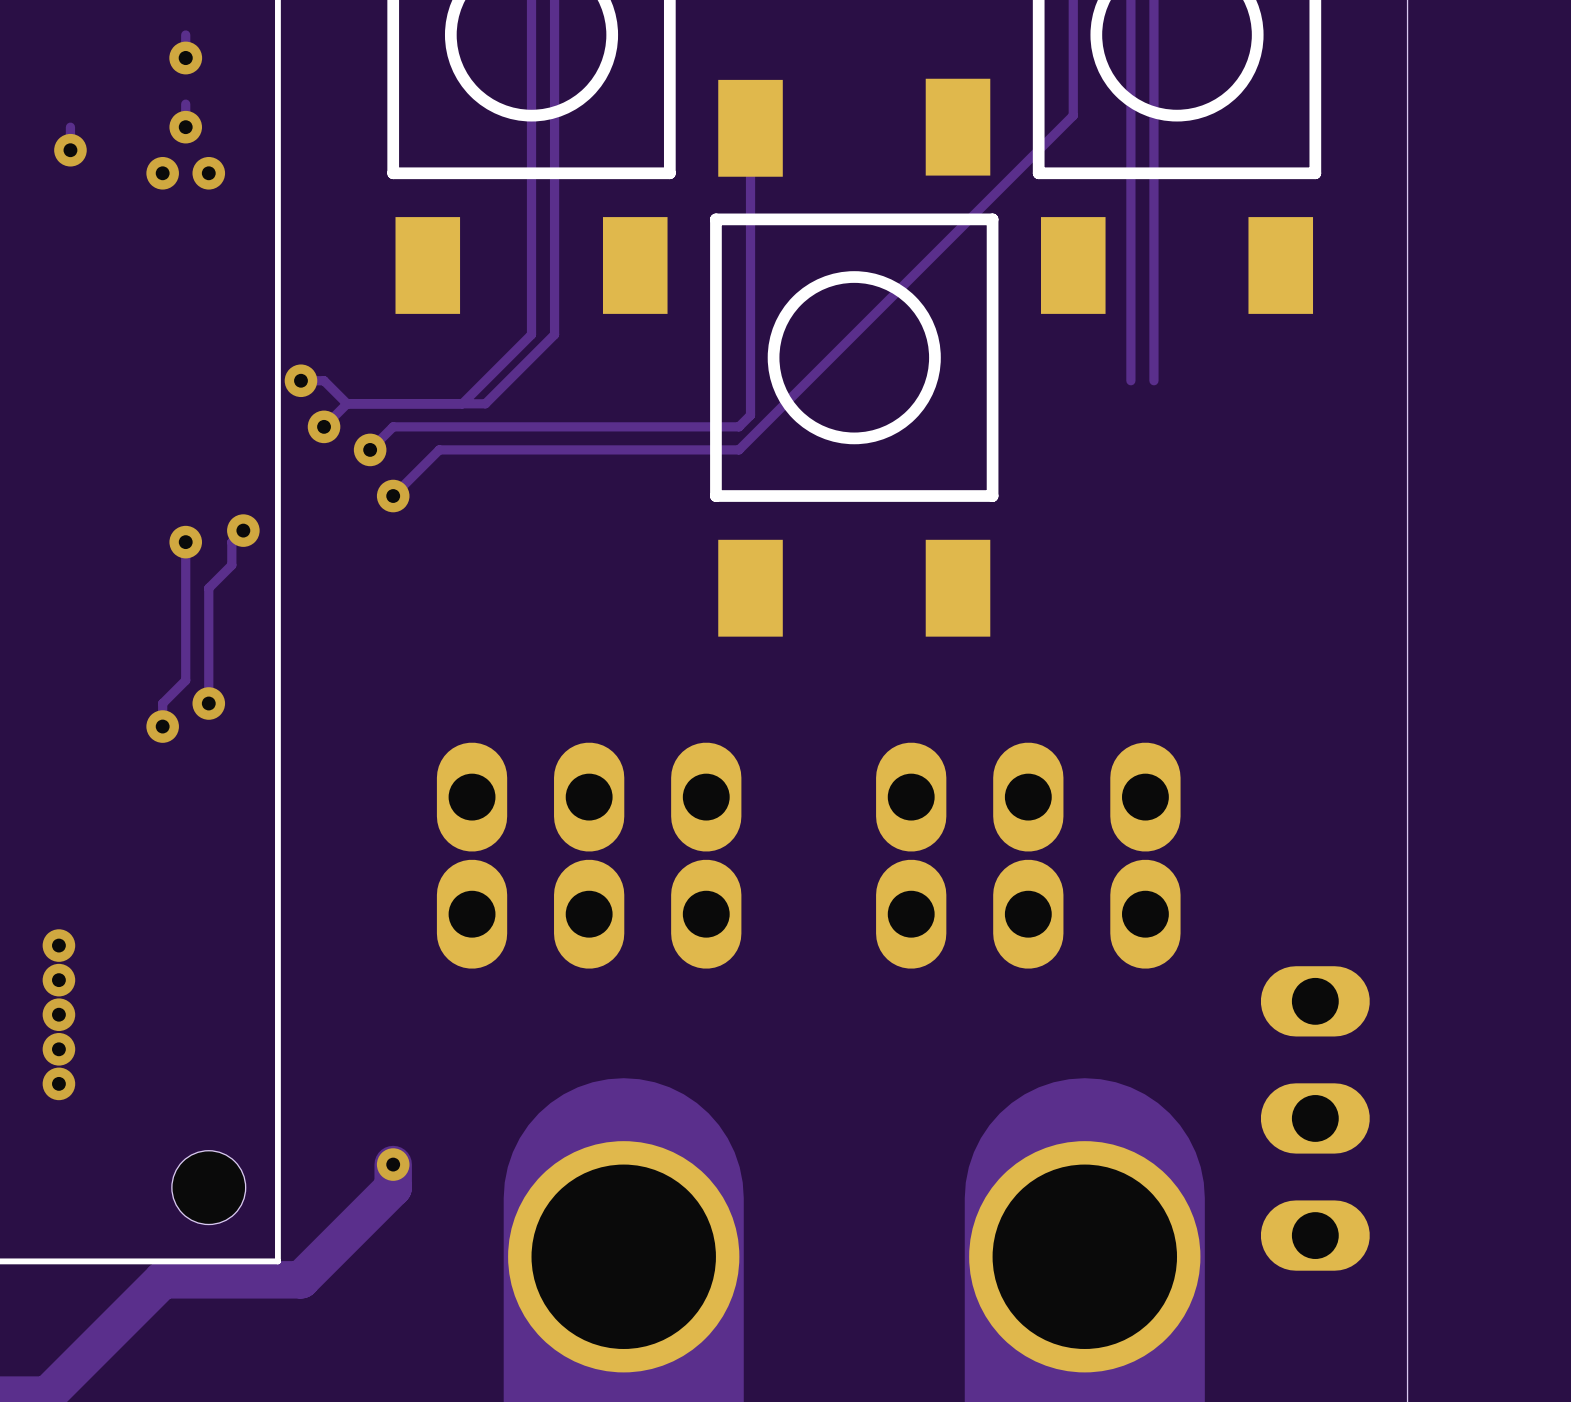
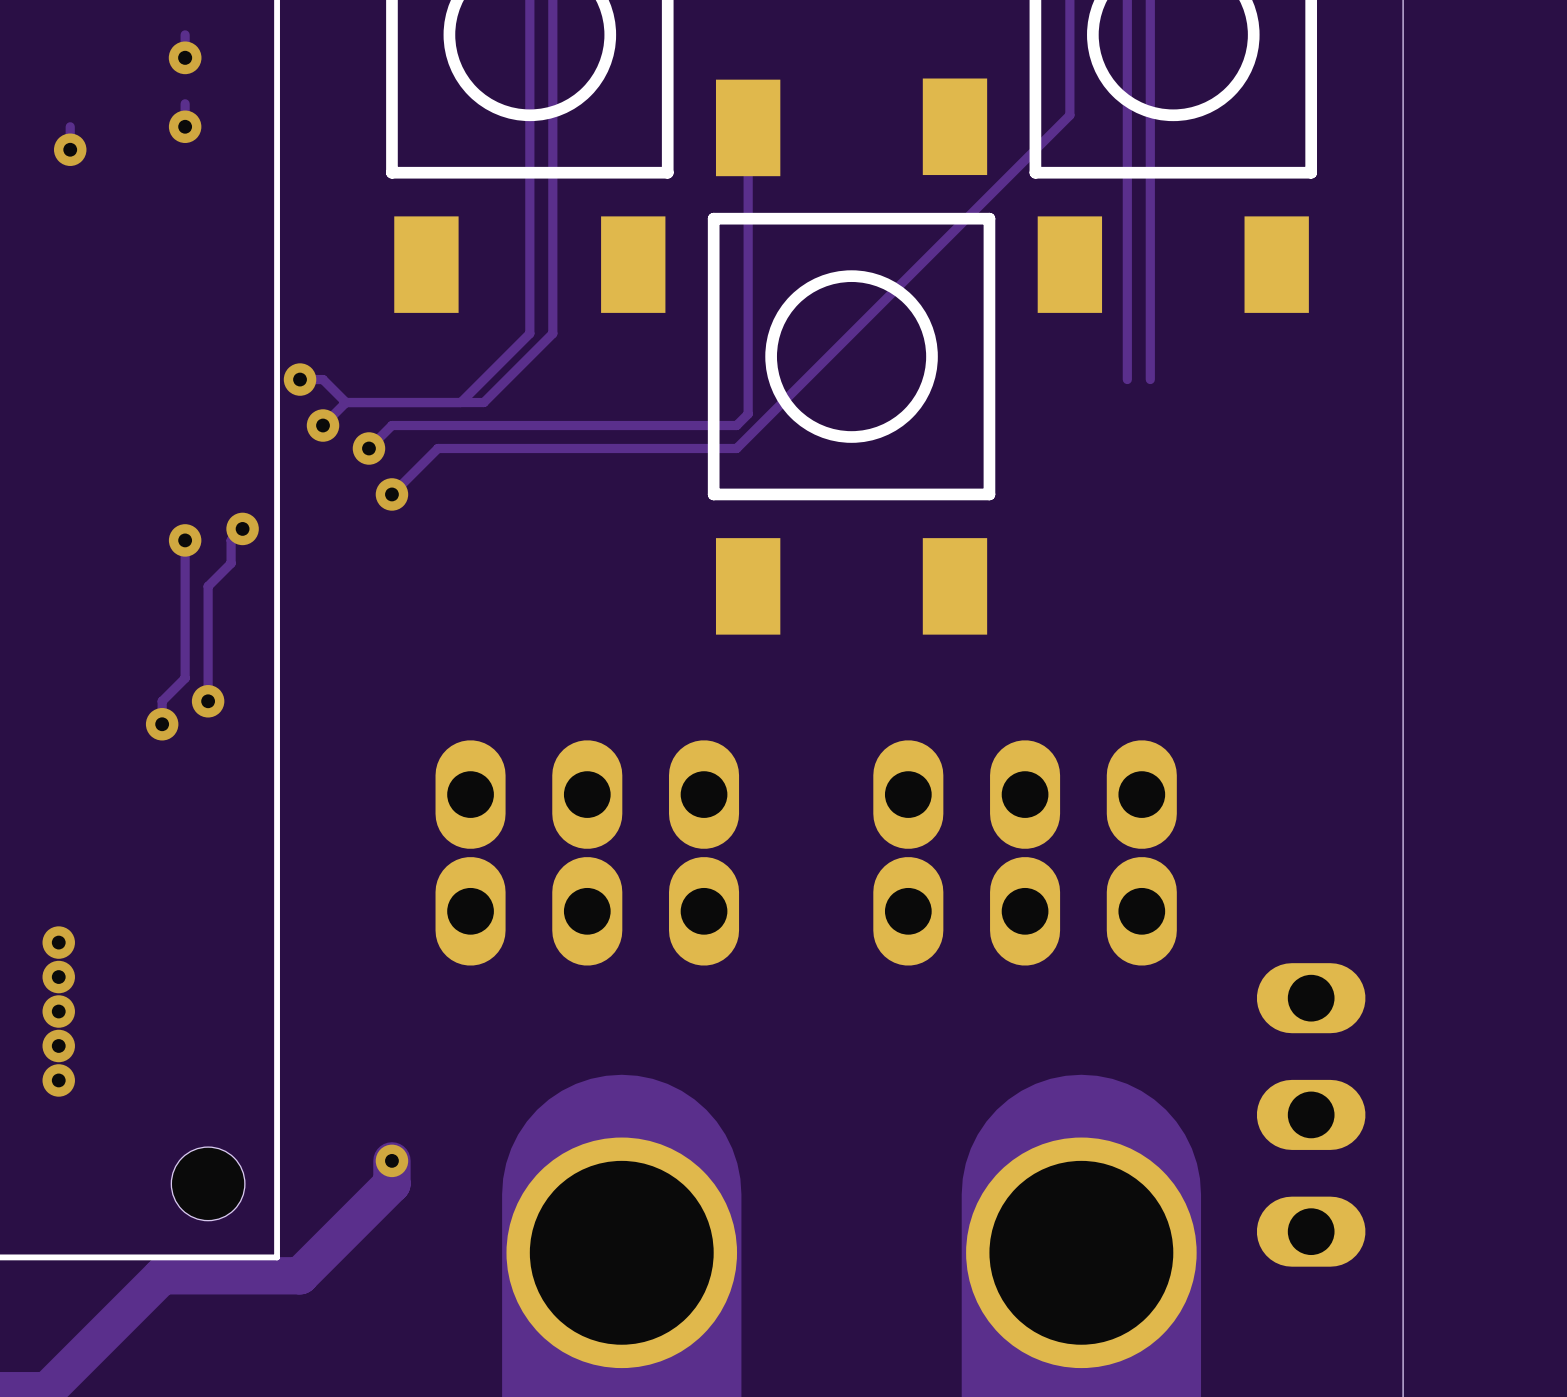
via: (162, 173) -> none
via: (208, 173) -> none

